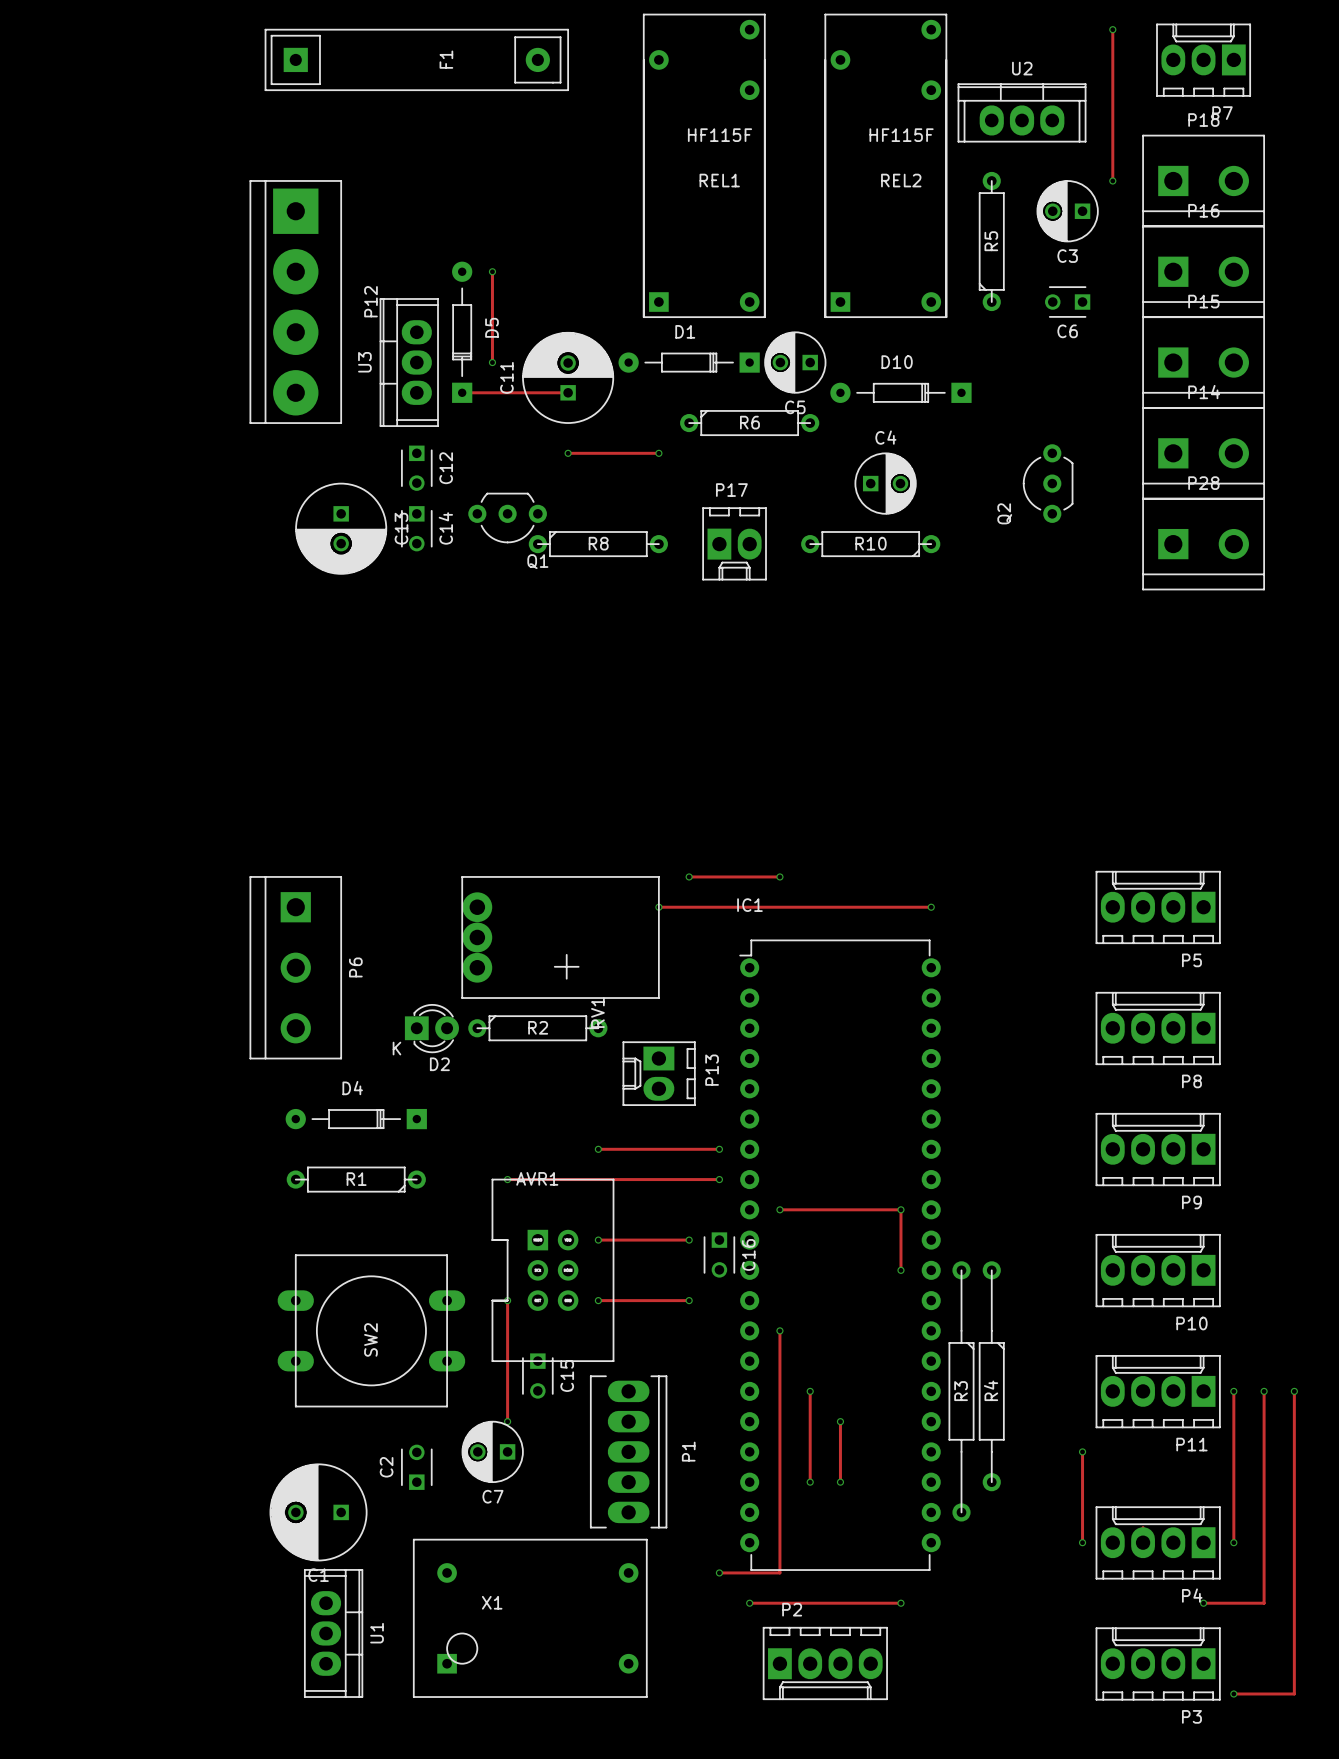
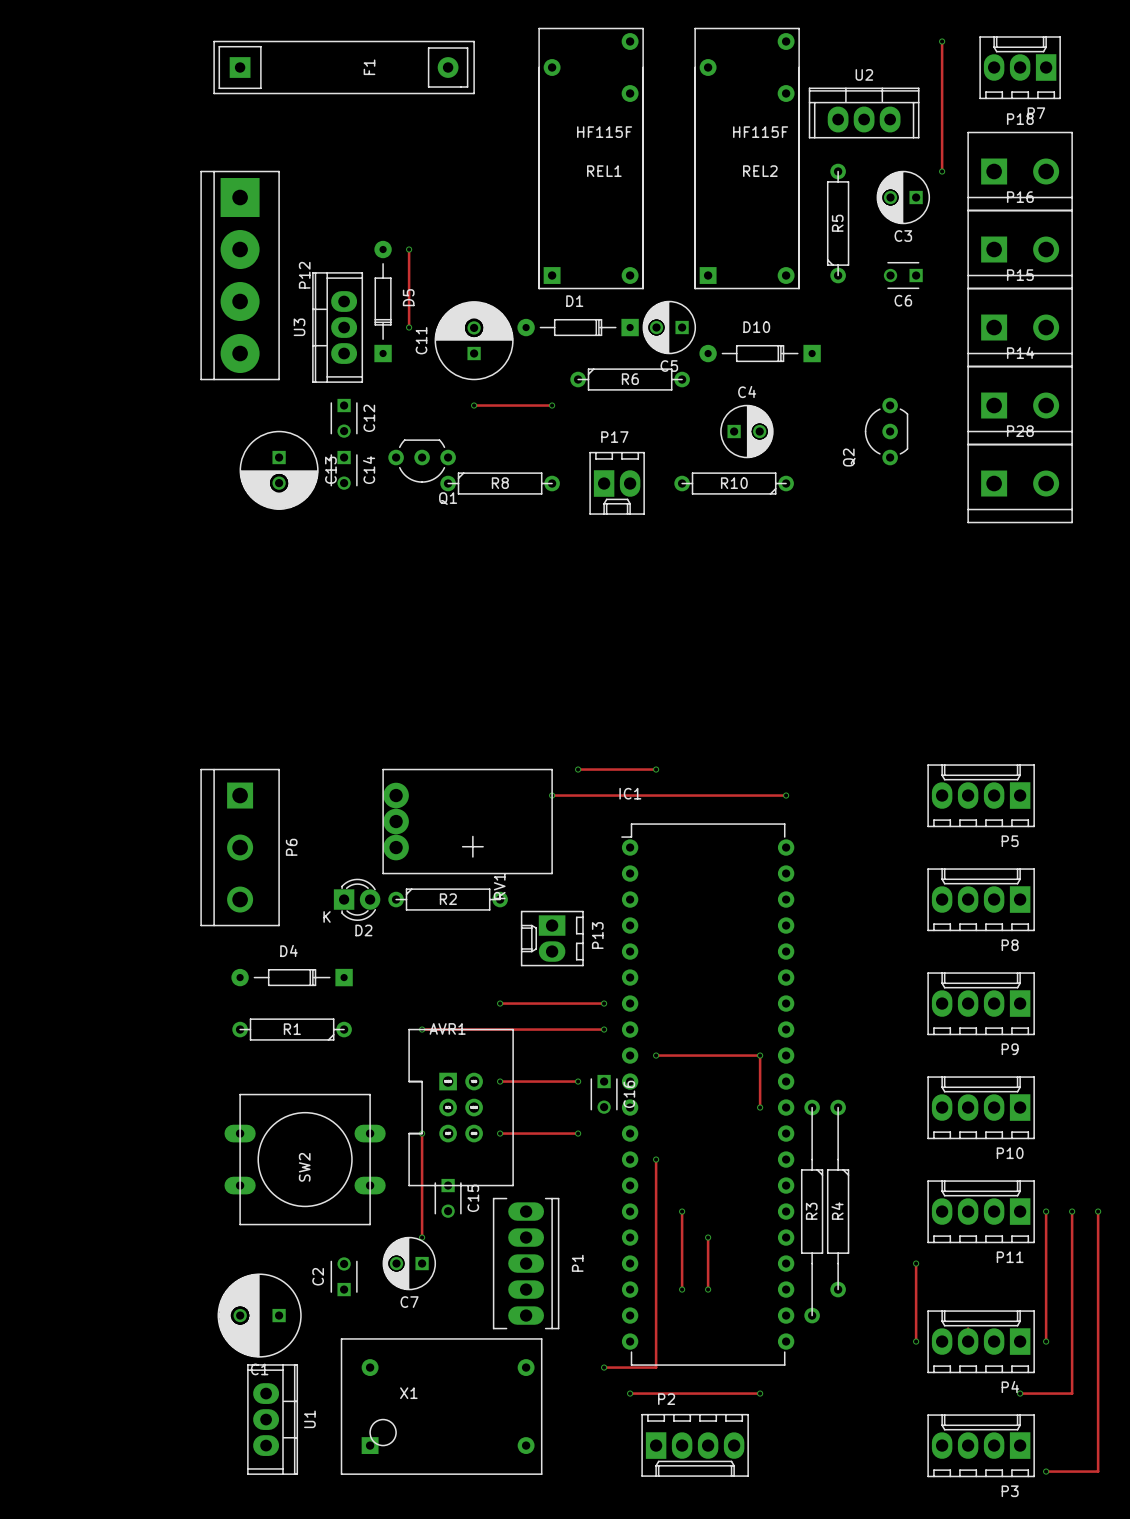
track: (462, 392) (568, 392) -> none

